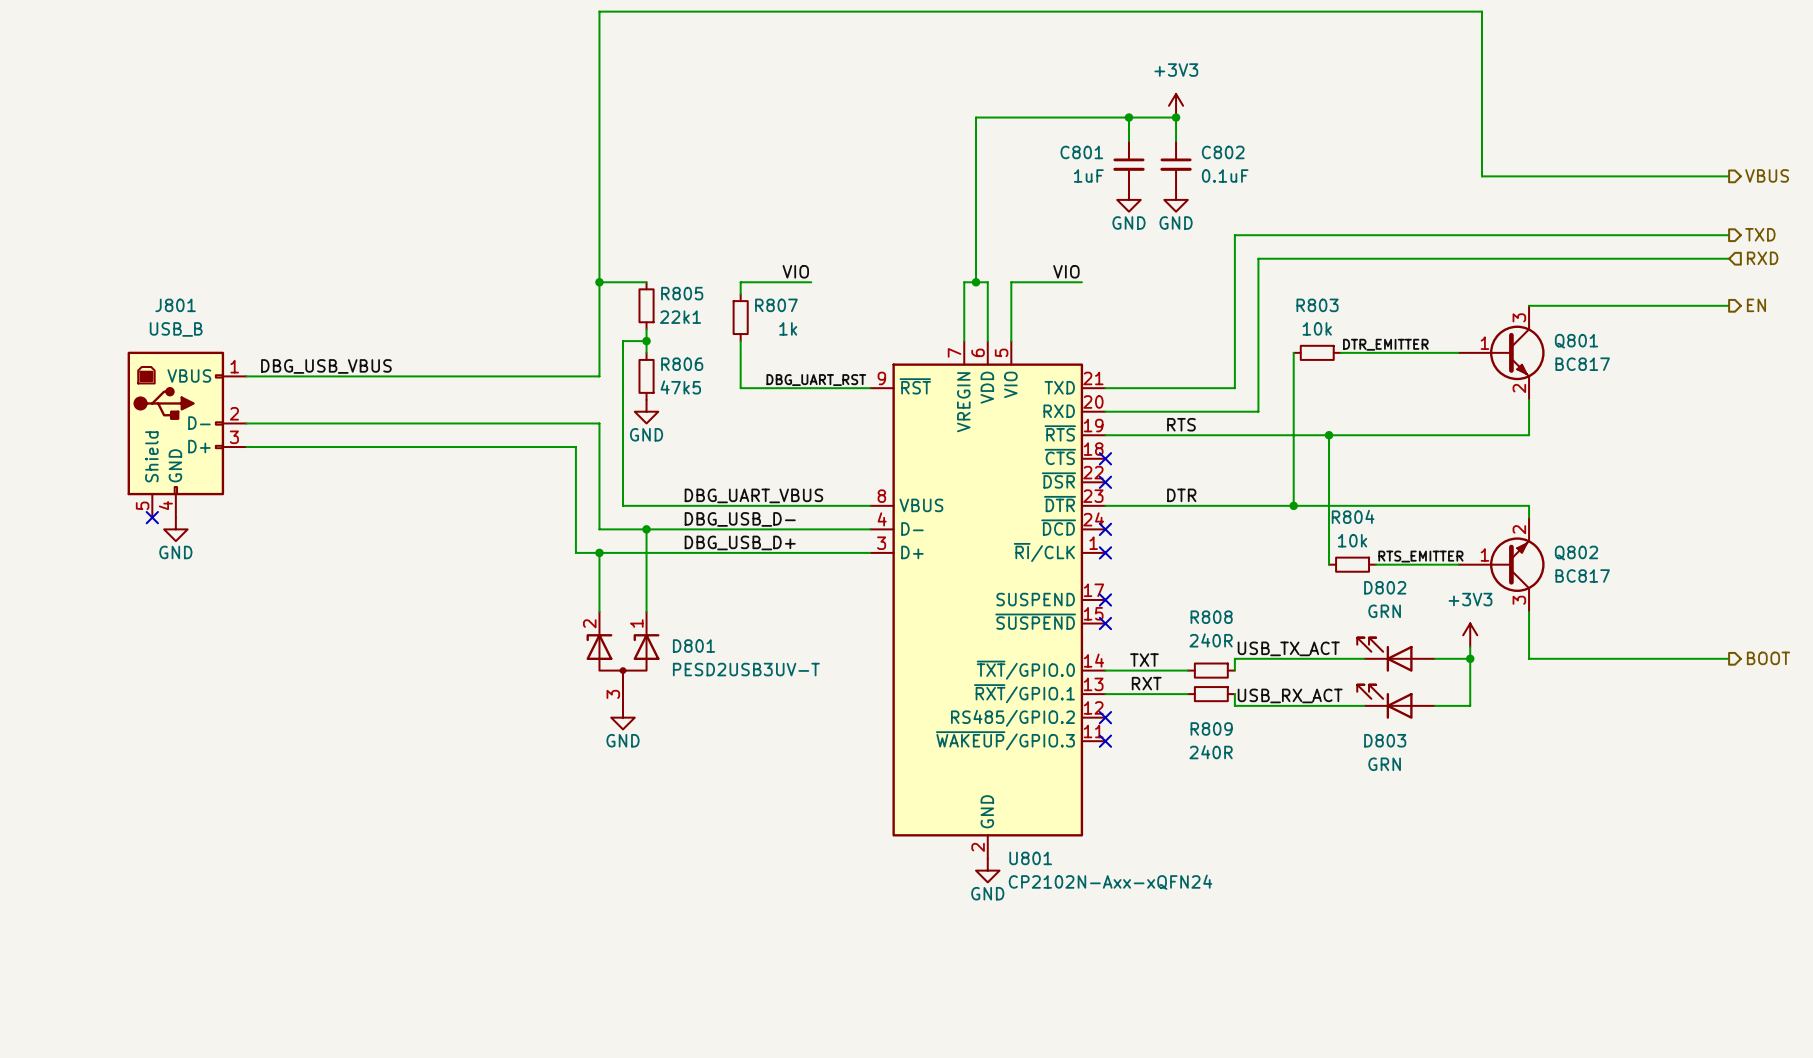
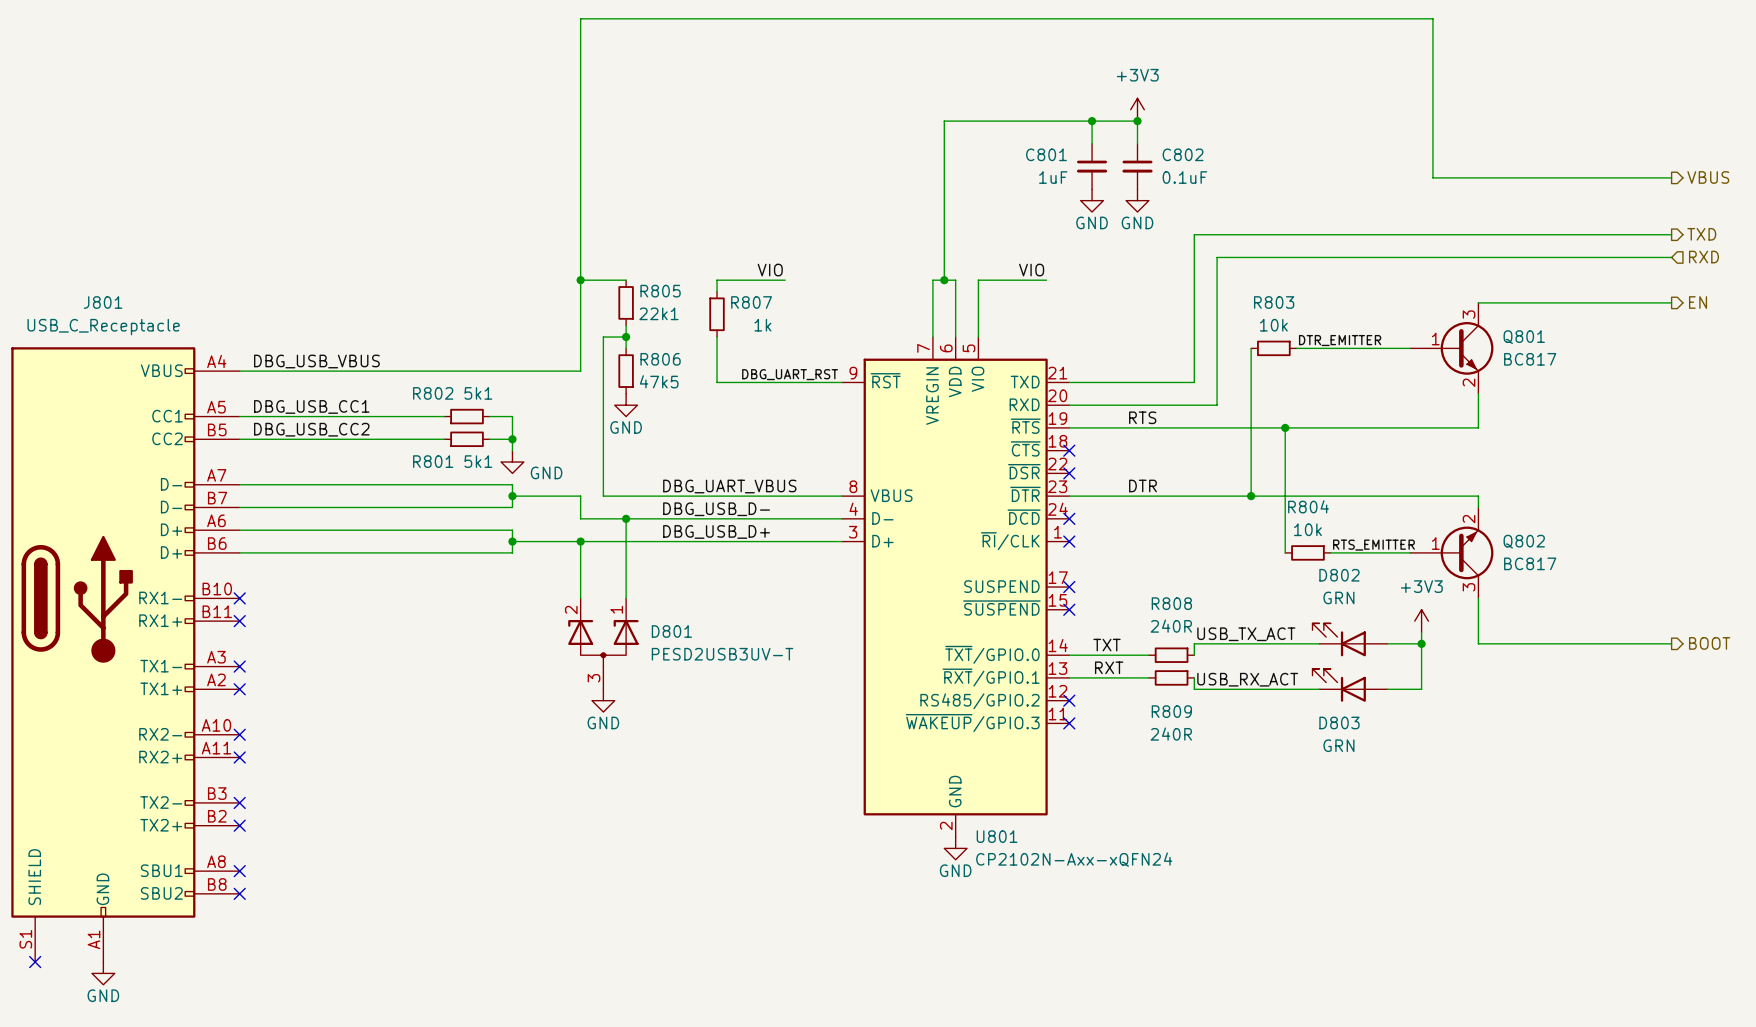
J801 name position: J801 (175, 305) -> J801 (103, 302)
J801 value: USB_B (176, 329) -> USB_C_Receptacle (103, 327)
J801 symbol: [127, 351, 247, 518] -> [11, 347, 240, 963]
label: none -> DBG_USB_CC1 (311, 406)
wire: (458, 423) (505, 423) -> none
R802: none -> 5k1 (467, 416)
wire: (528, 423) (599, 423) (599, 505) -> (512, 496) (580, 496)
wire: none -> (512, 416) (512, 450)
label: none -> DBG_USB_CC2 (311, 429)
wire: (458, 447) (505, 447) -> none
R801: none -> 5k1 (467, 439)
wire: (528, 447) (575, 447) (575, 552) -> (512, 541) (557, 541)
junction: none -> (512, 439)
power symbol: none -> GND (512, 462)
wire: none -> (239, 484) (512, 484) (512, 507) (239, 507)
junction: none -> (512, 496)
no-connect mark: (152, 517) -> none
power symbol: GND (175, 529) -> none
wire: none -> (239, 530) (512, 530) (512, 552) (239, 552)
junction: none -> (512, 541)
no-connect mark: none -> (239, 598)
no-connect mark: none -> (239, 621)
no-connect mark: none -> (239, 666)
no-connect mark: none -> (239, 689)
no-connect mark: none -> (239, 734)
no-connect mark: none -> (239, 757)
no-connect mark: none -> (239, 802)
no-connect mark: none -> (239, 825)
no-connect mark: none -> (239, 871)
no-connect mark: none -> (239, 893)
no-connect mark: none -> (35, 962)
power symbol: none -> GND (103, 973)

